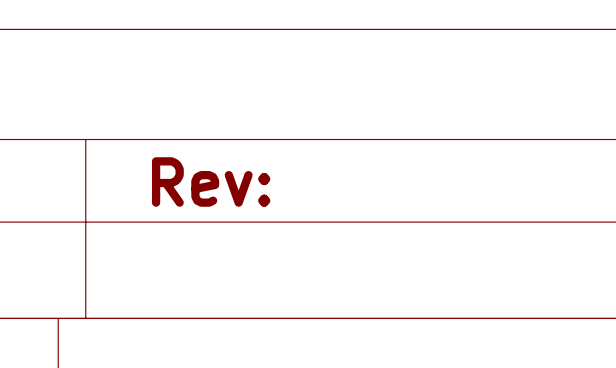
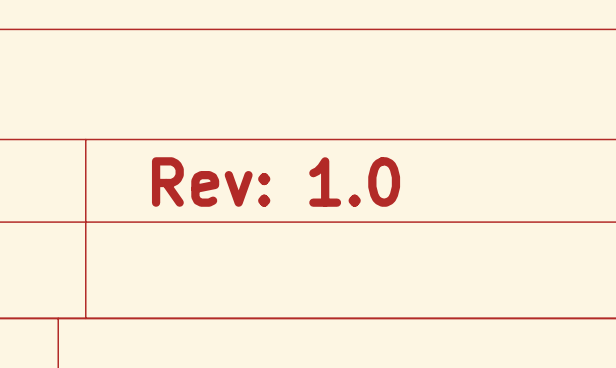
title block: Rev: (211, 182) -> Rev: 1.0 (276, 182)

